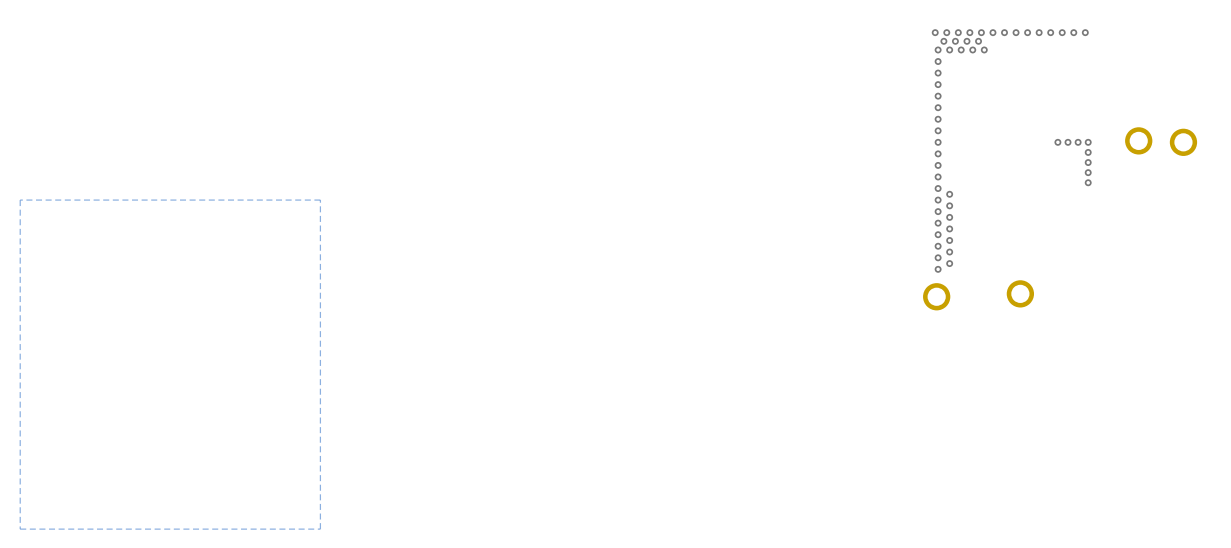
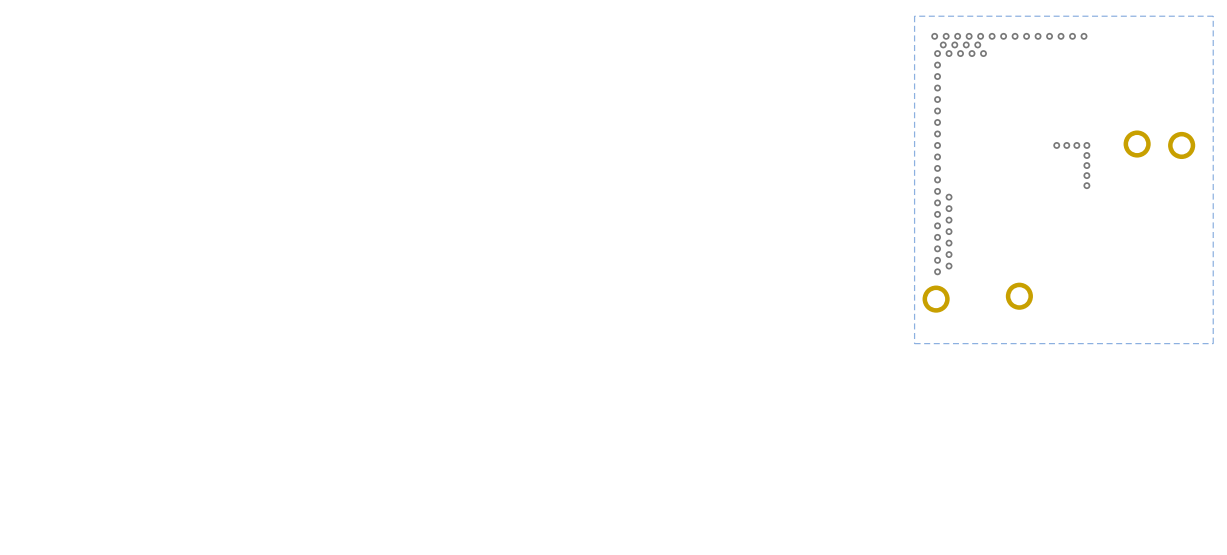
zone outline: none -> (1213, 16) (1213, 343) (914, 343) (914, 16) (1213, 16)
zone outline: (320, 200) (320, 529) (20, 529) (20, 200) (320, 200) -> none

